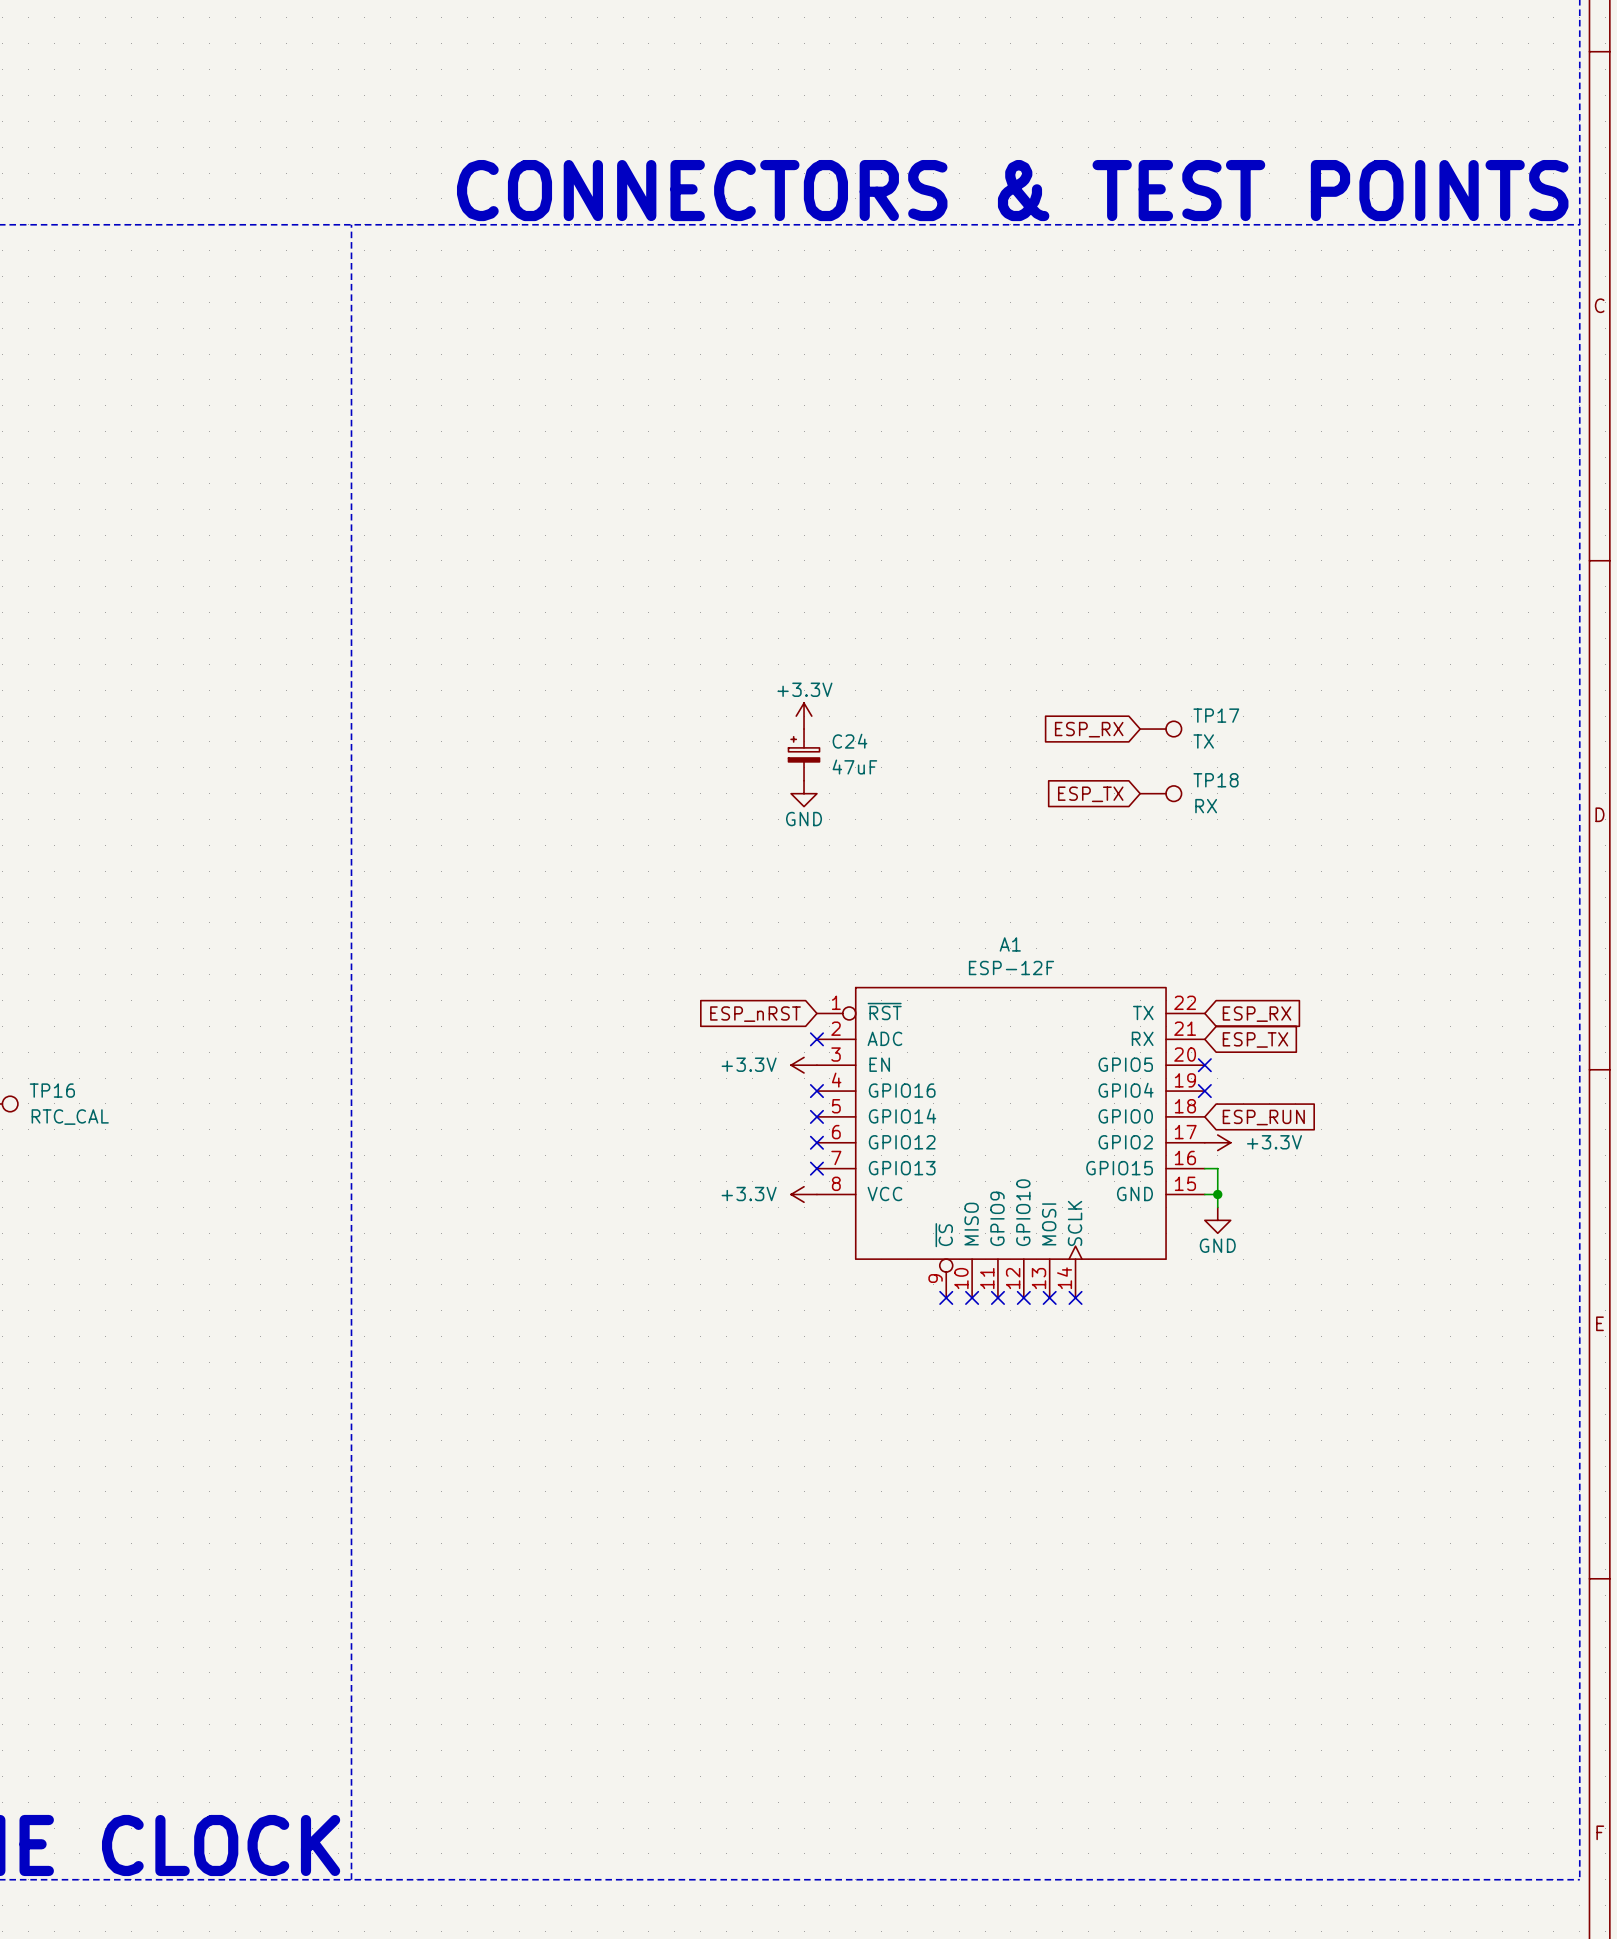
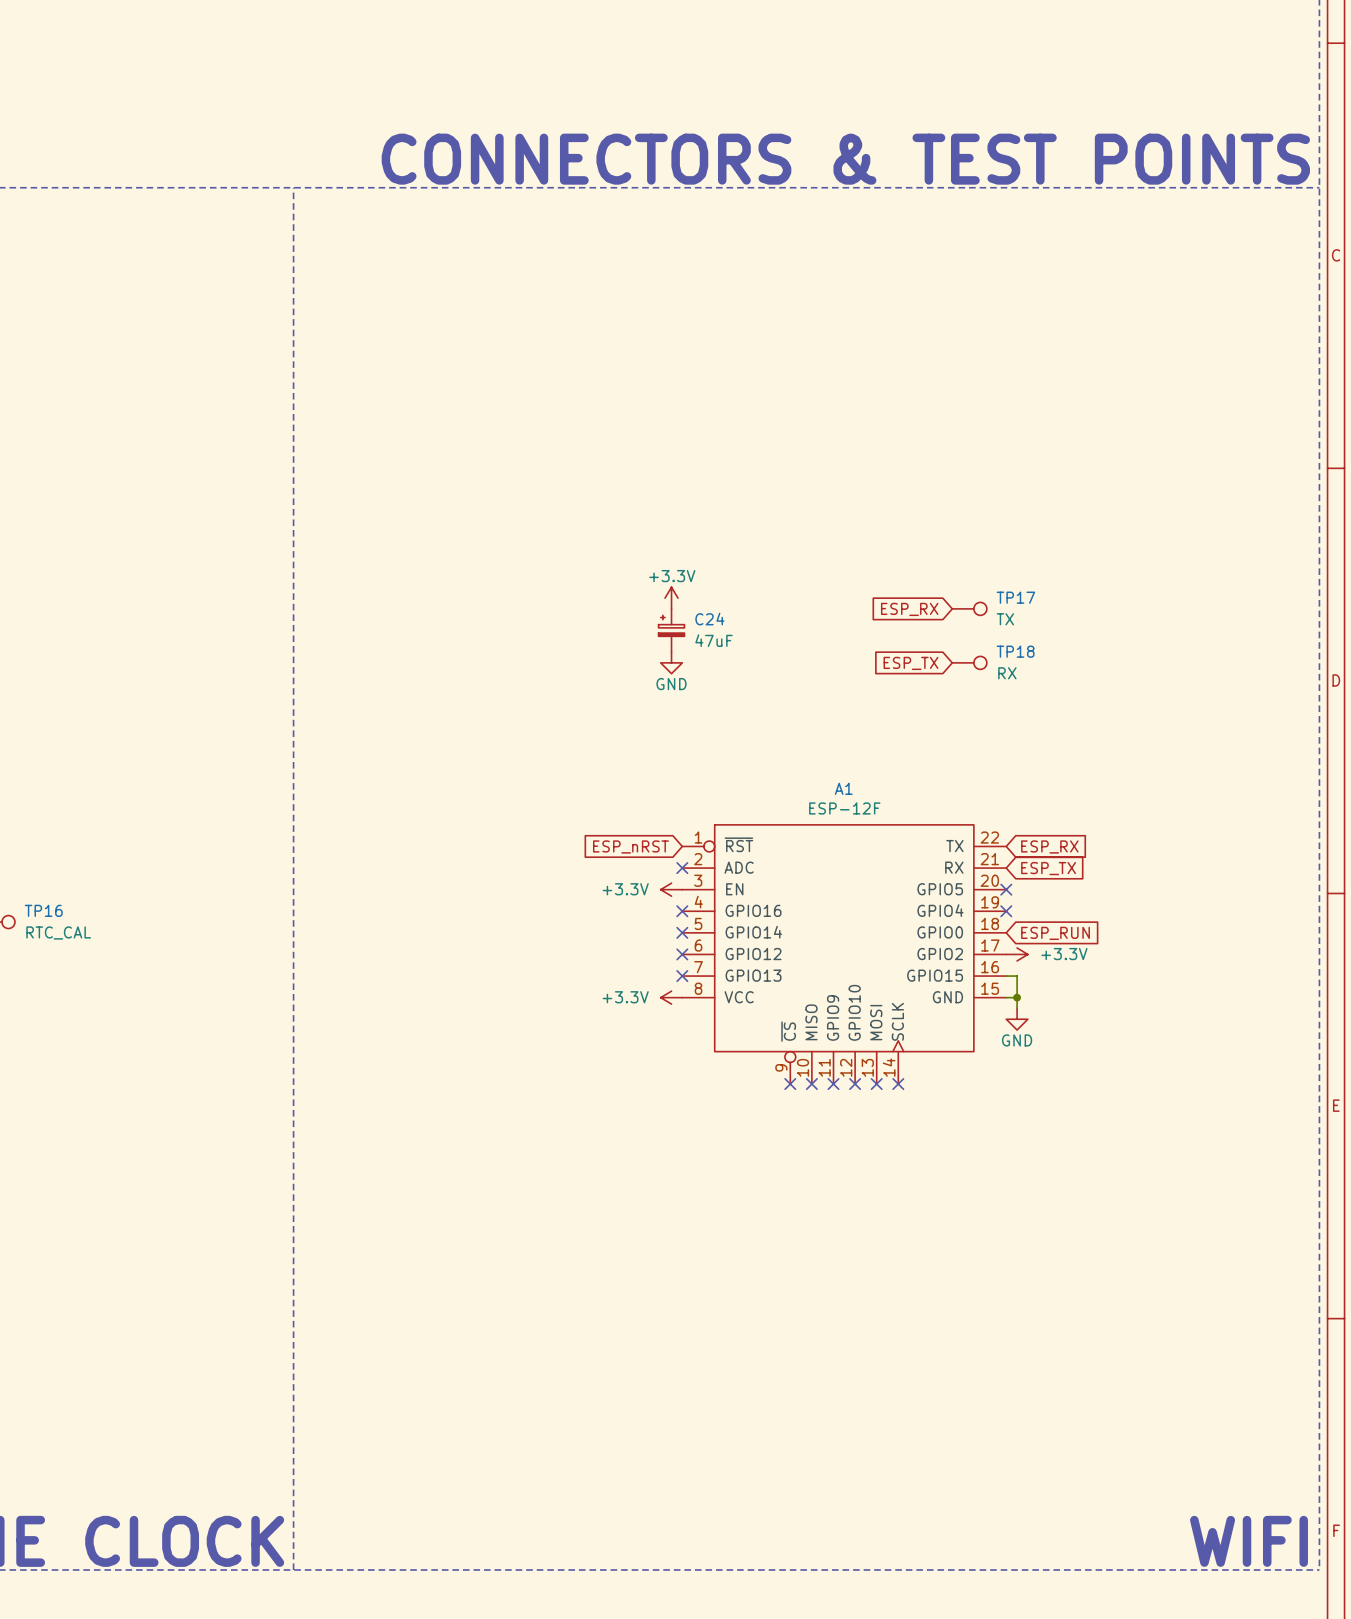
text: none -> WIFI (1249, 1541)

